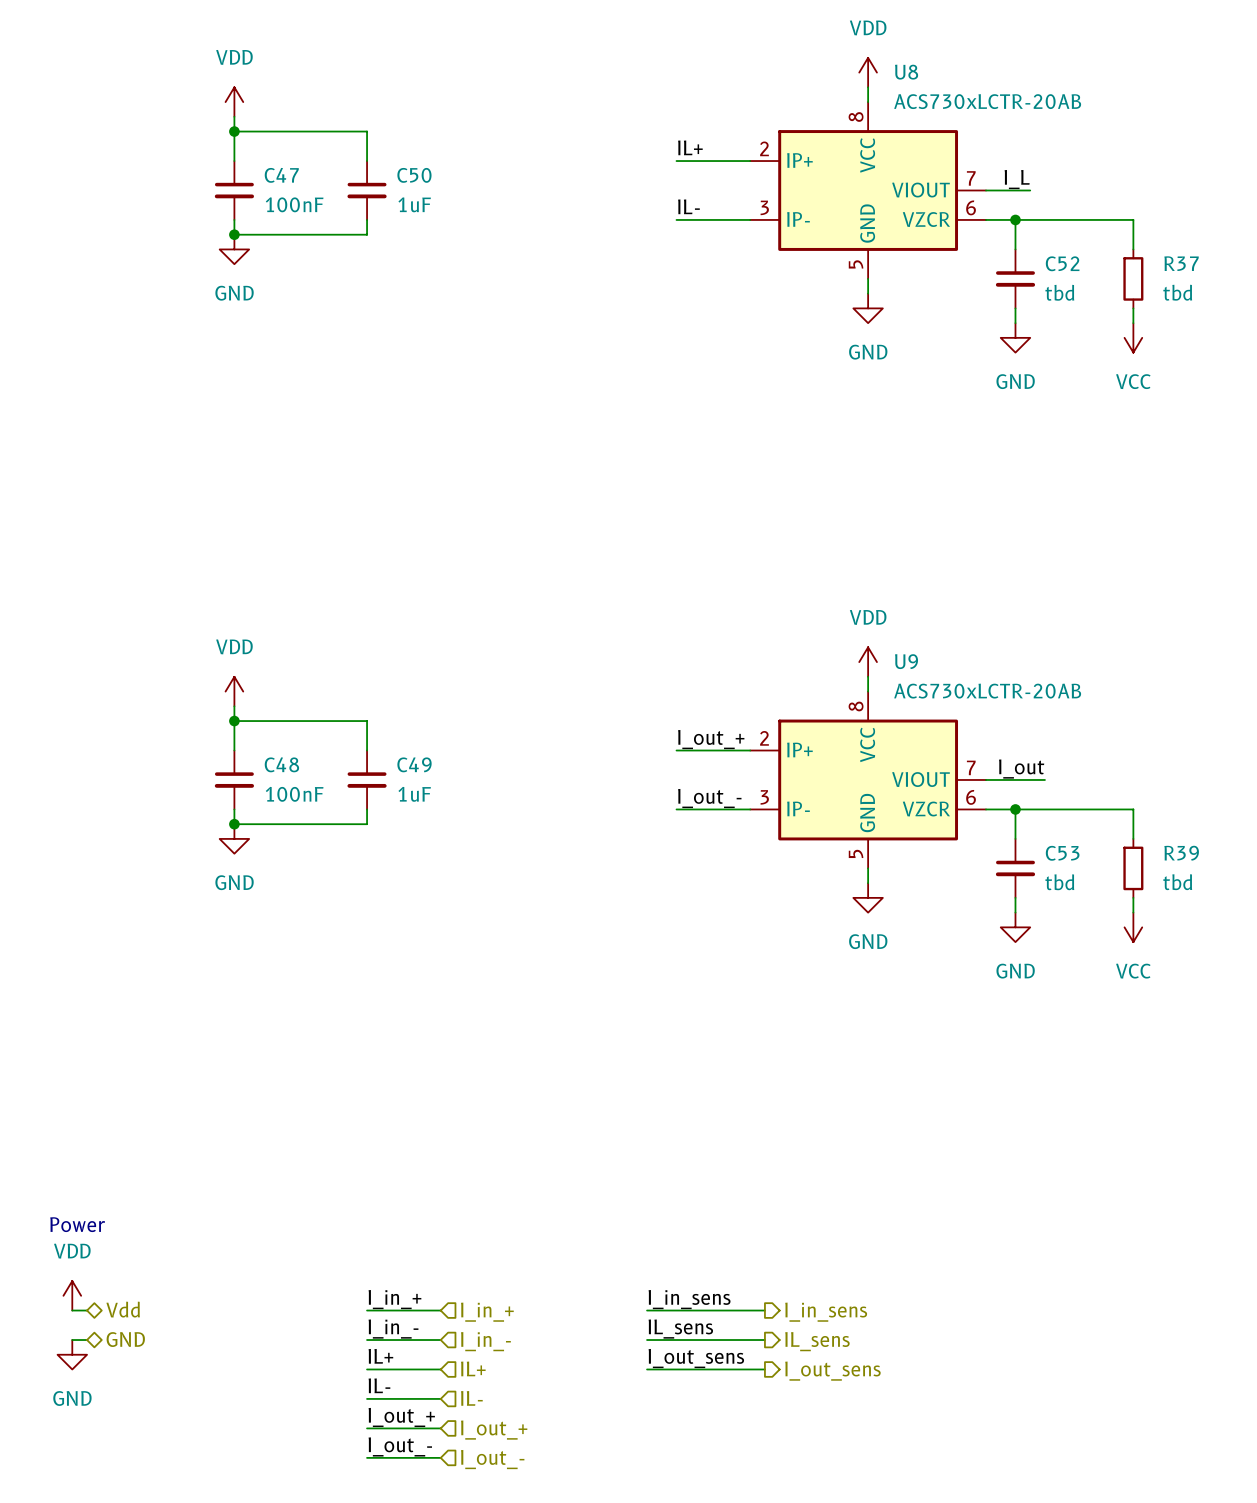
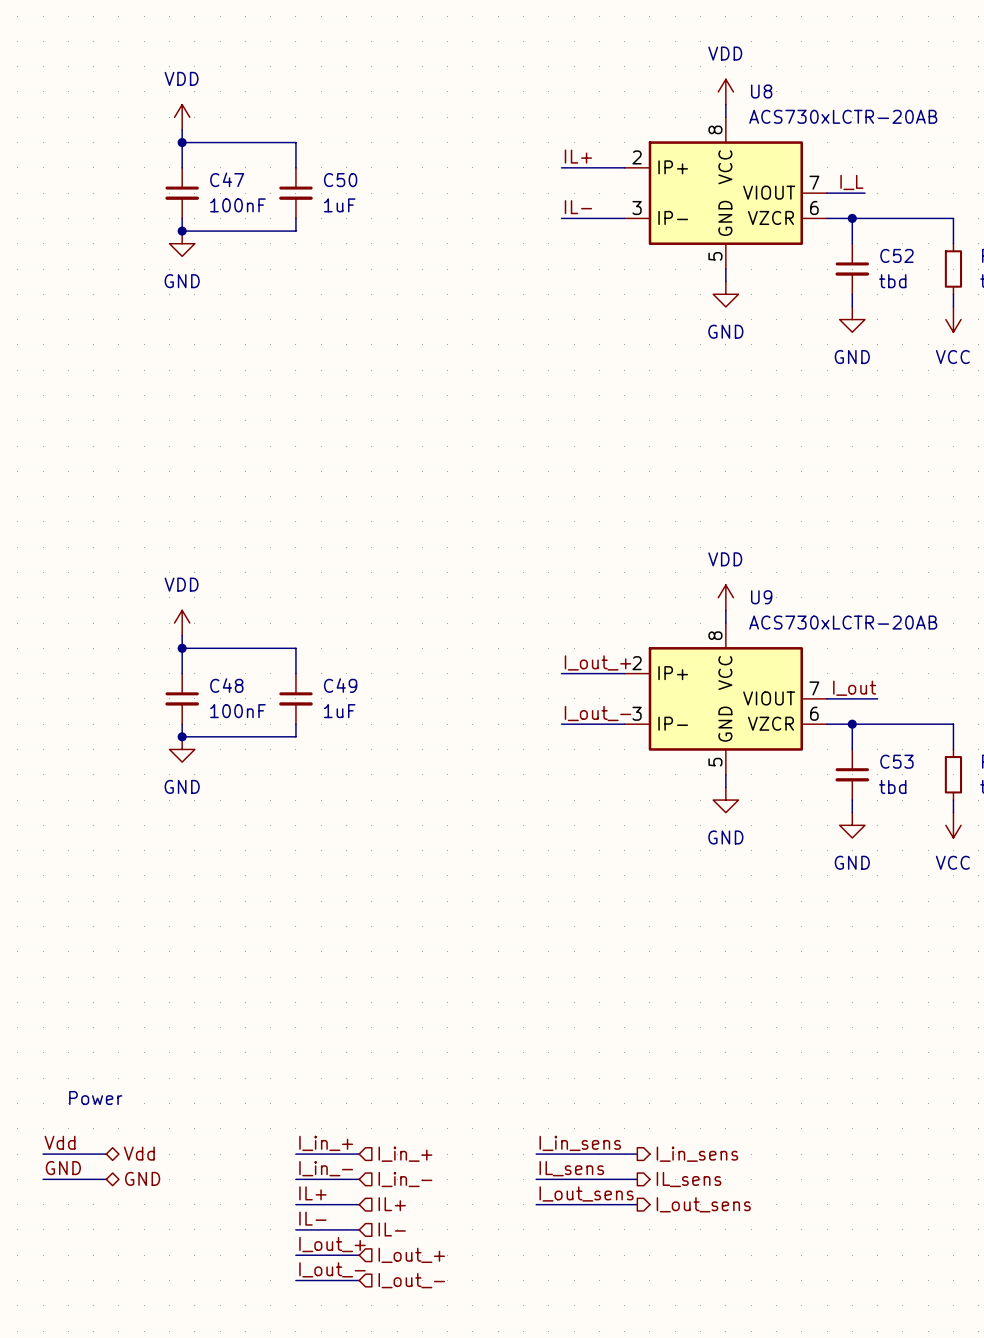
text position: Power (77, 1224) -> Power (95, 1098)
power symbol: VDD (72, 1295) -> none
label: none -> Vdd (60, 1142)
hierarchical label position: Vdd (123, 1309) -> Vdd (139, 1153)
wire: none -> (55, 1154) (106, 1154)
label: none -> GND (63, 1168)
hierarchical label position: GND (125, 1339) -> GND (142, 1178)
wire: none -> (55, 1179) (106, 1179)
power symbol: GND (72, 1354) -> none

